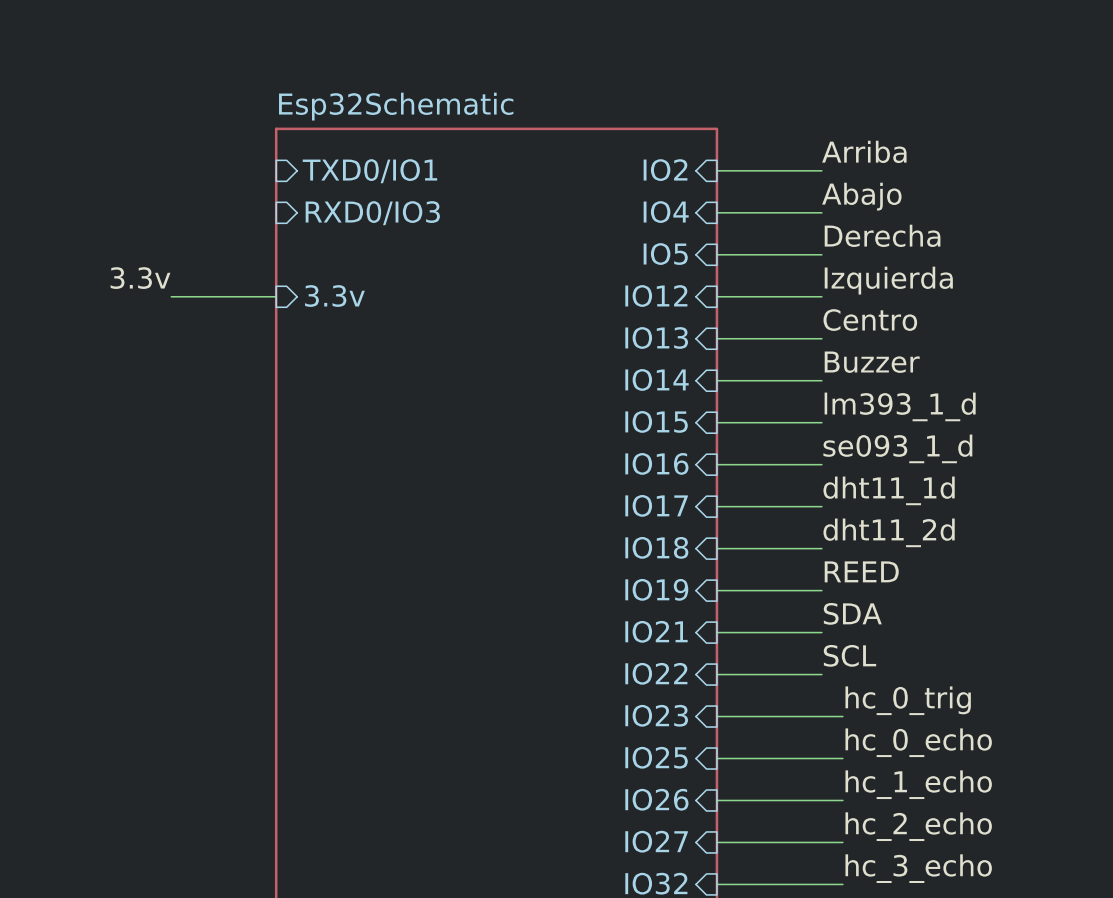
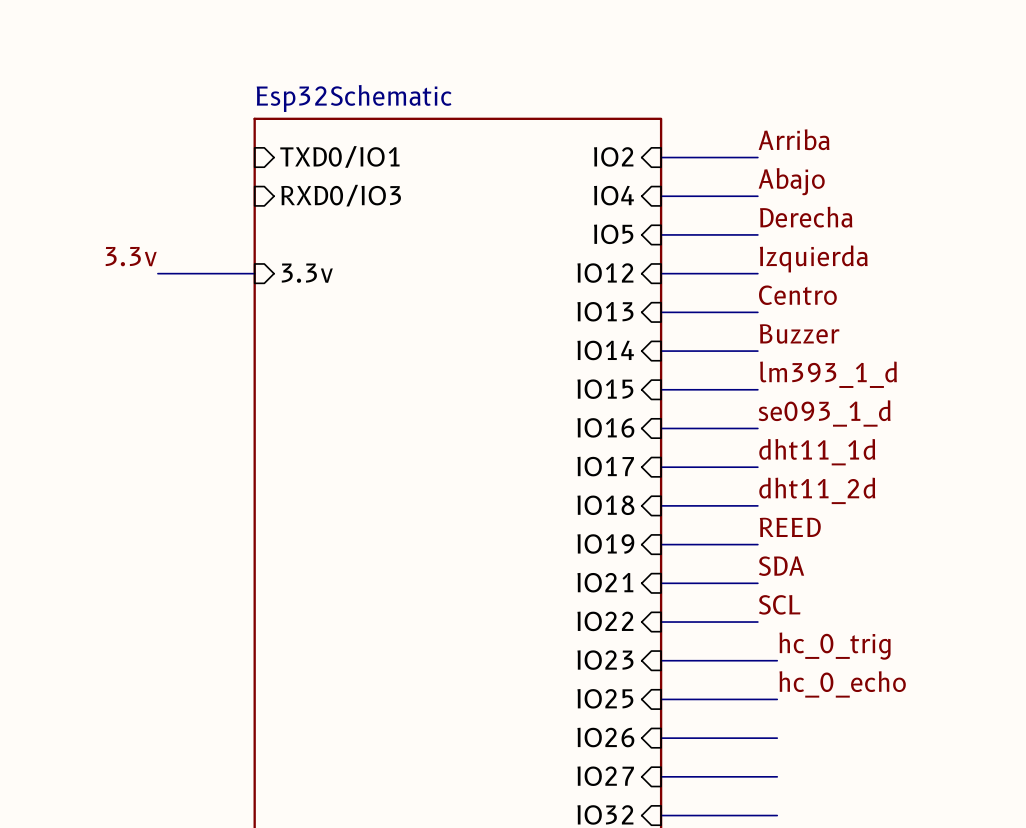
label: hc_1_echo (918, 784) -> none
label: hc_2_echo (918, 826) -> none
label: hc_3_echo (918, 868) -> none

